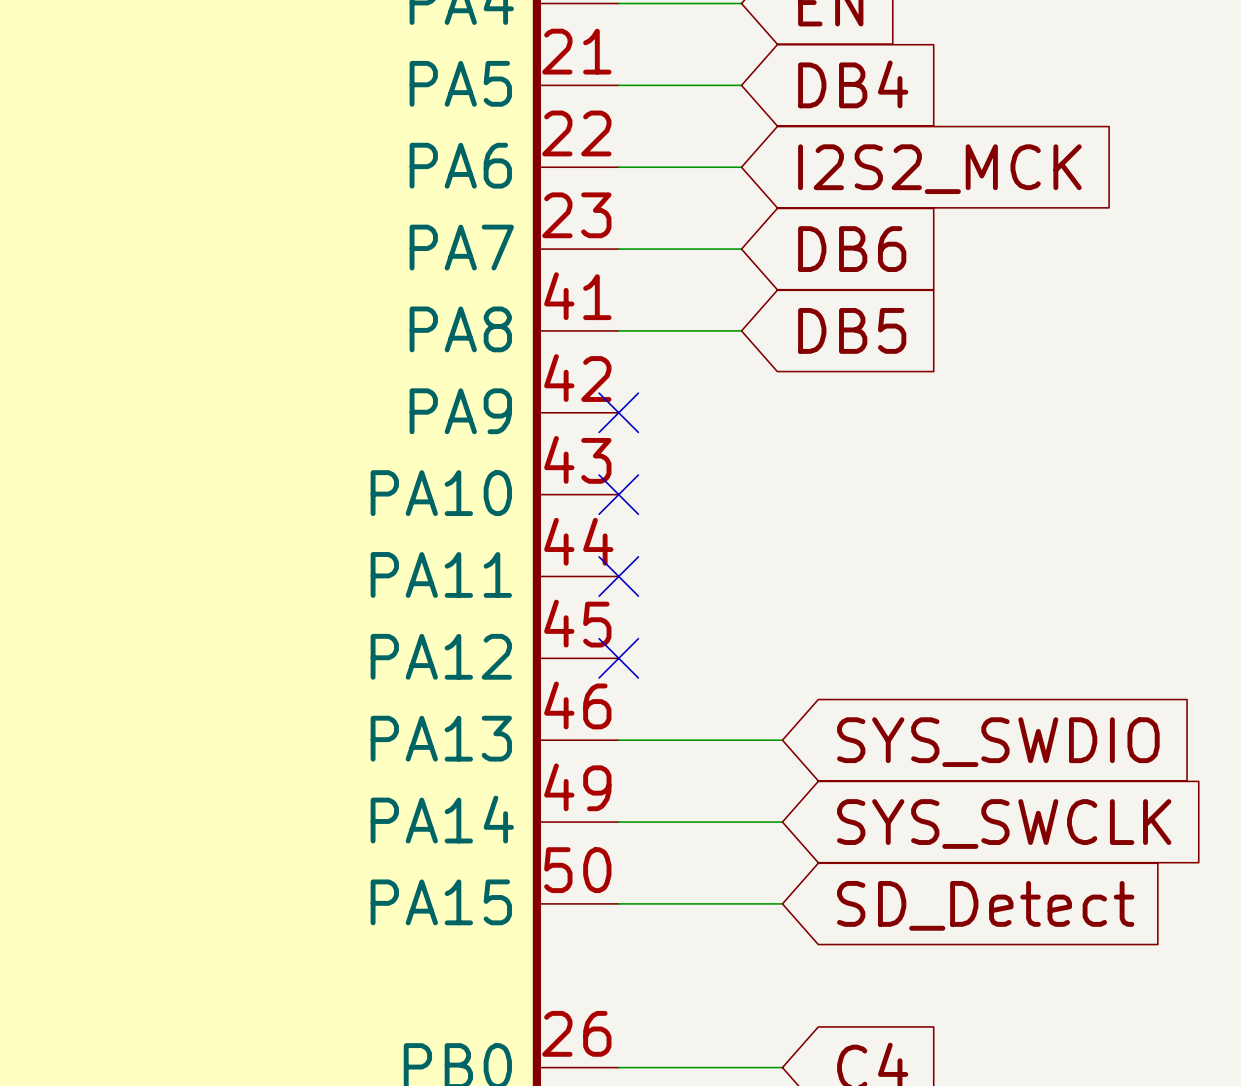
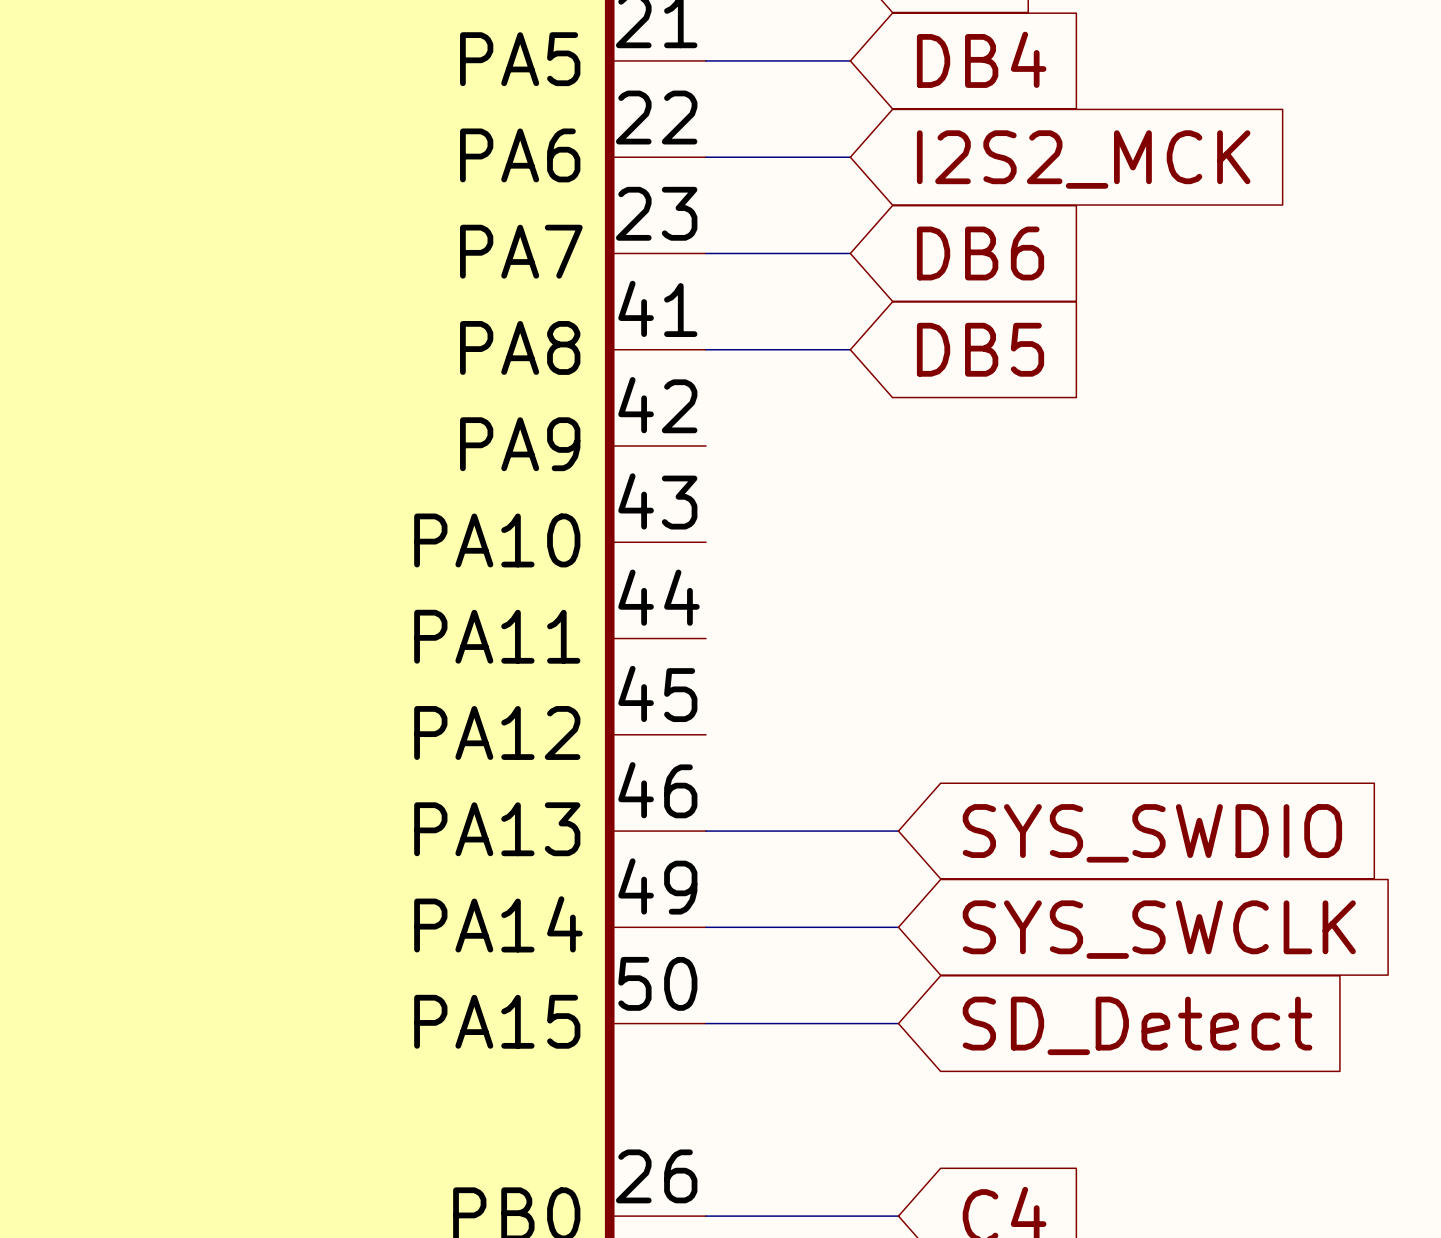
no-connect mark: (618, 412) -> none
no-connect mark: (618, 494) -> none
no-connect mark: (618, 576) -> none
no-connect mark: (618, 658) -> none

